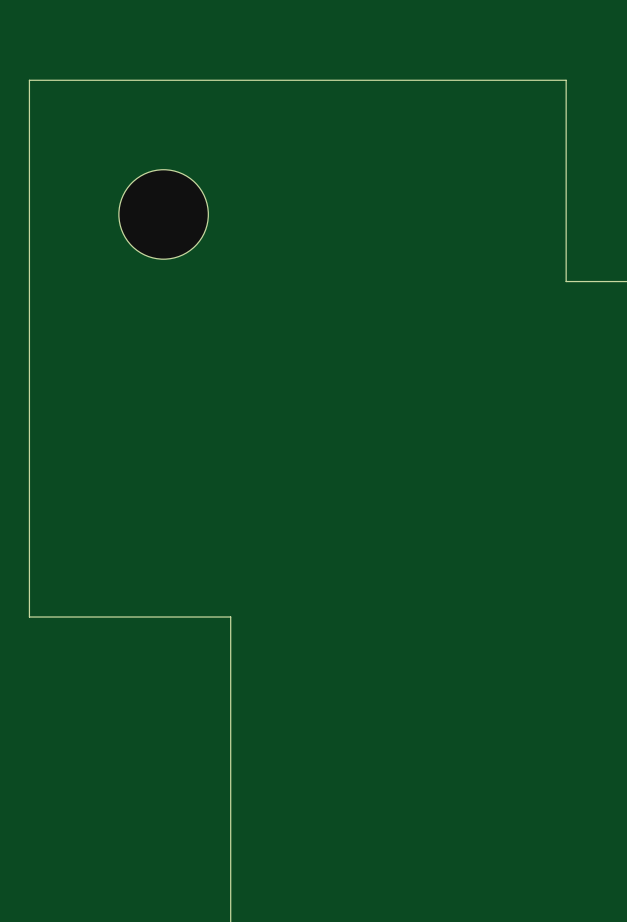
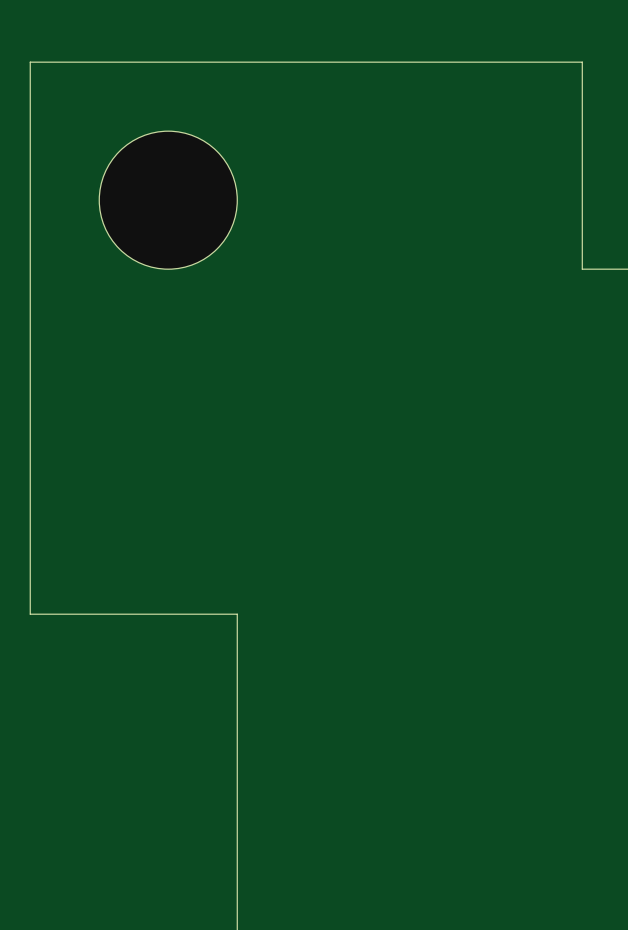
hole size: [118, 169, 209, 260] -> [99, 131, 238, 270]

